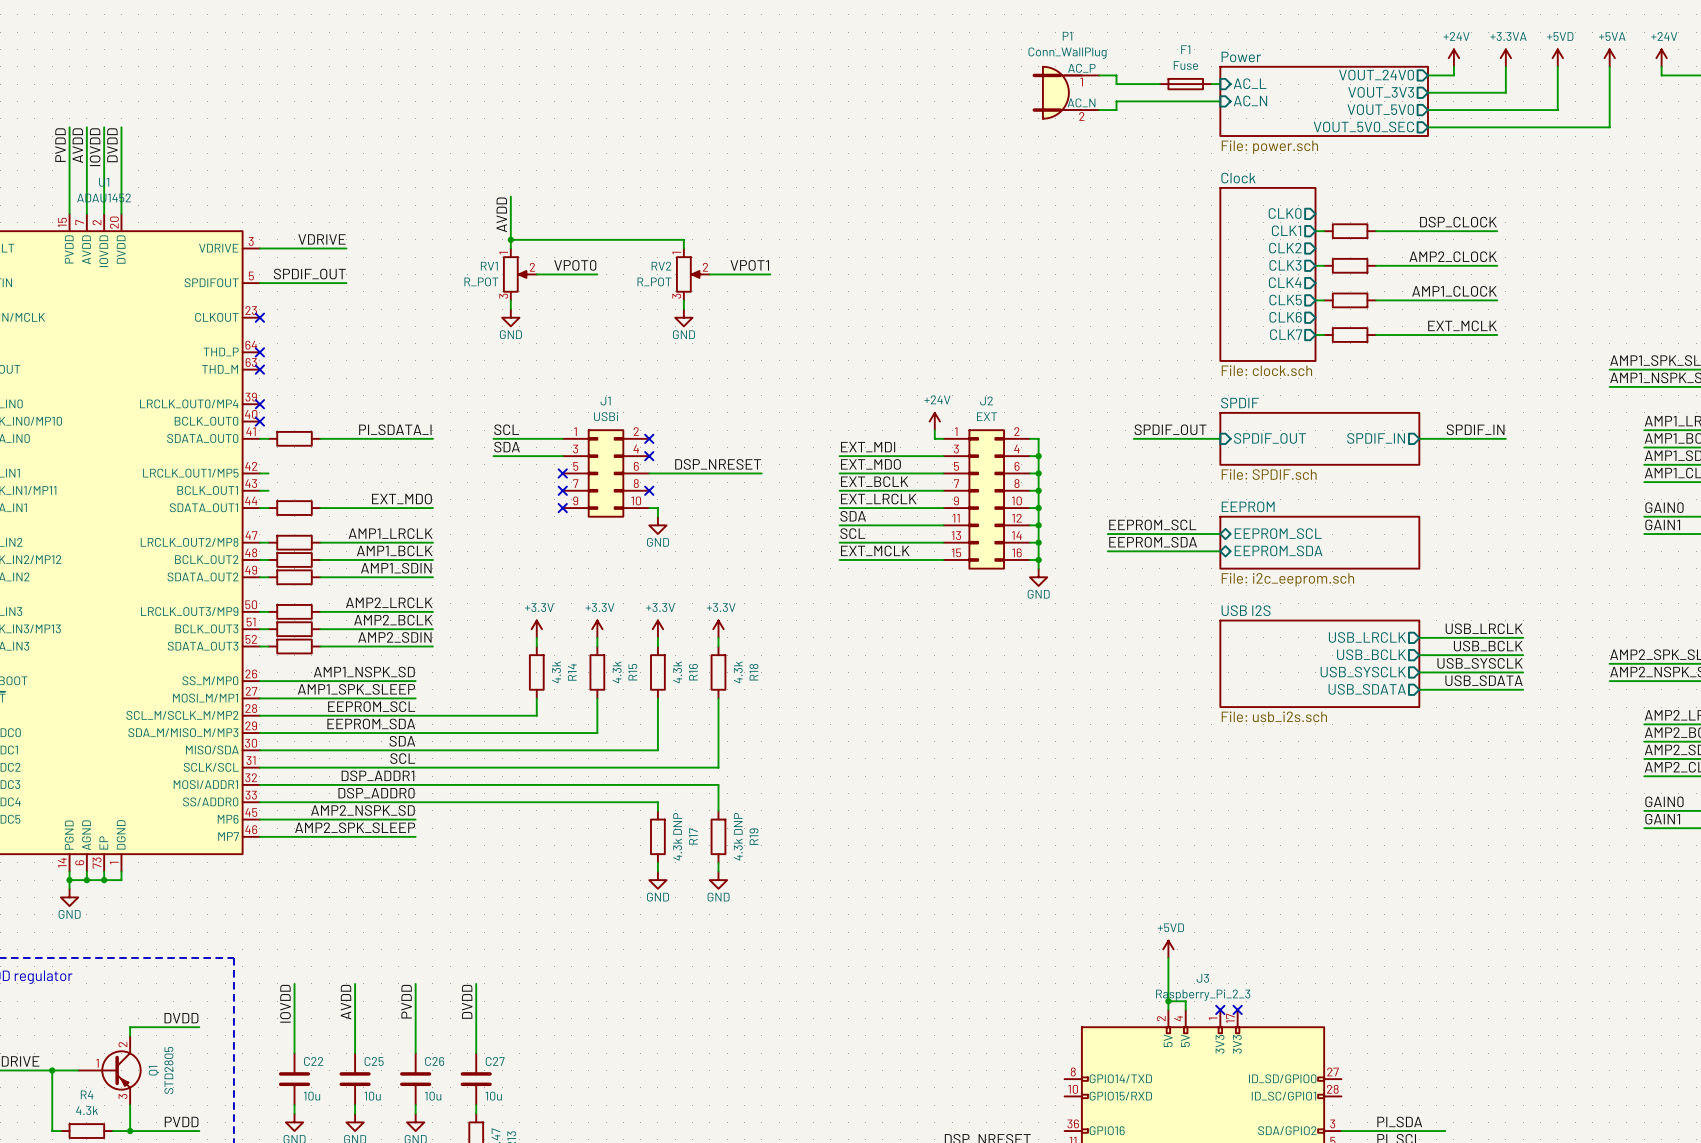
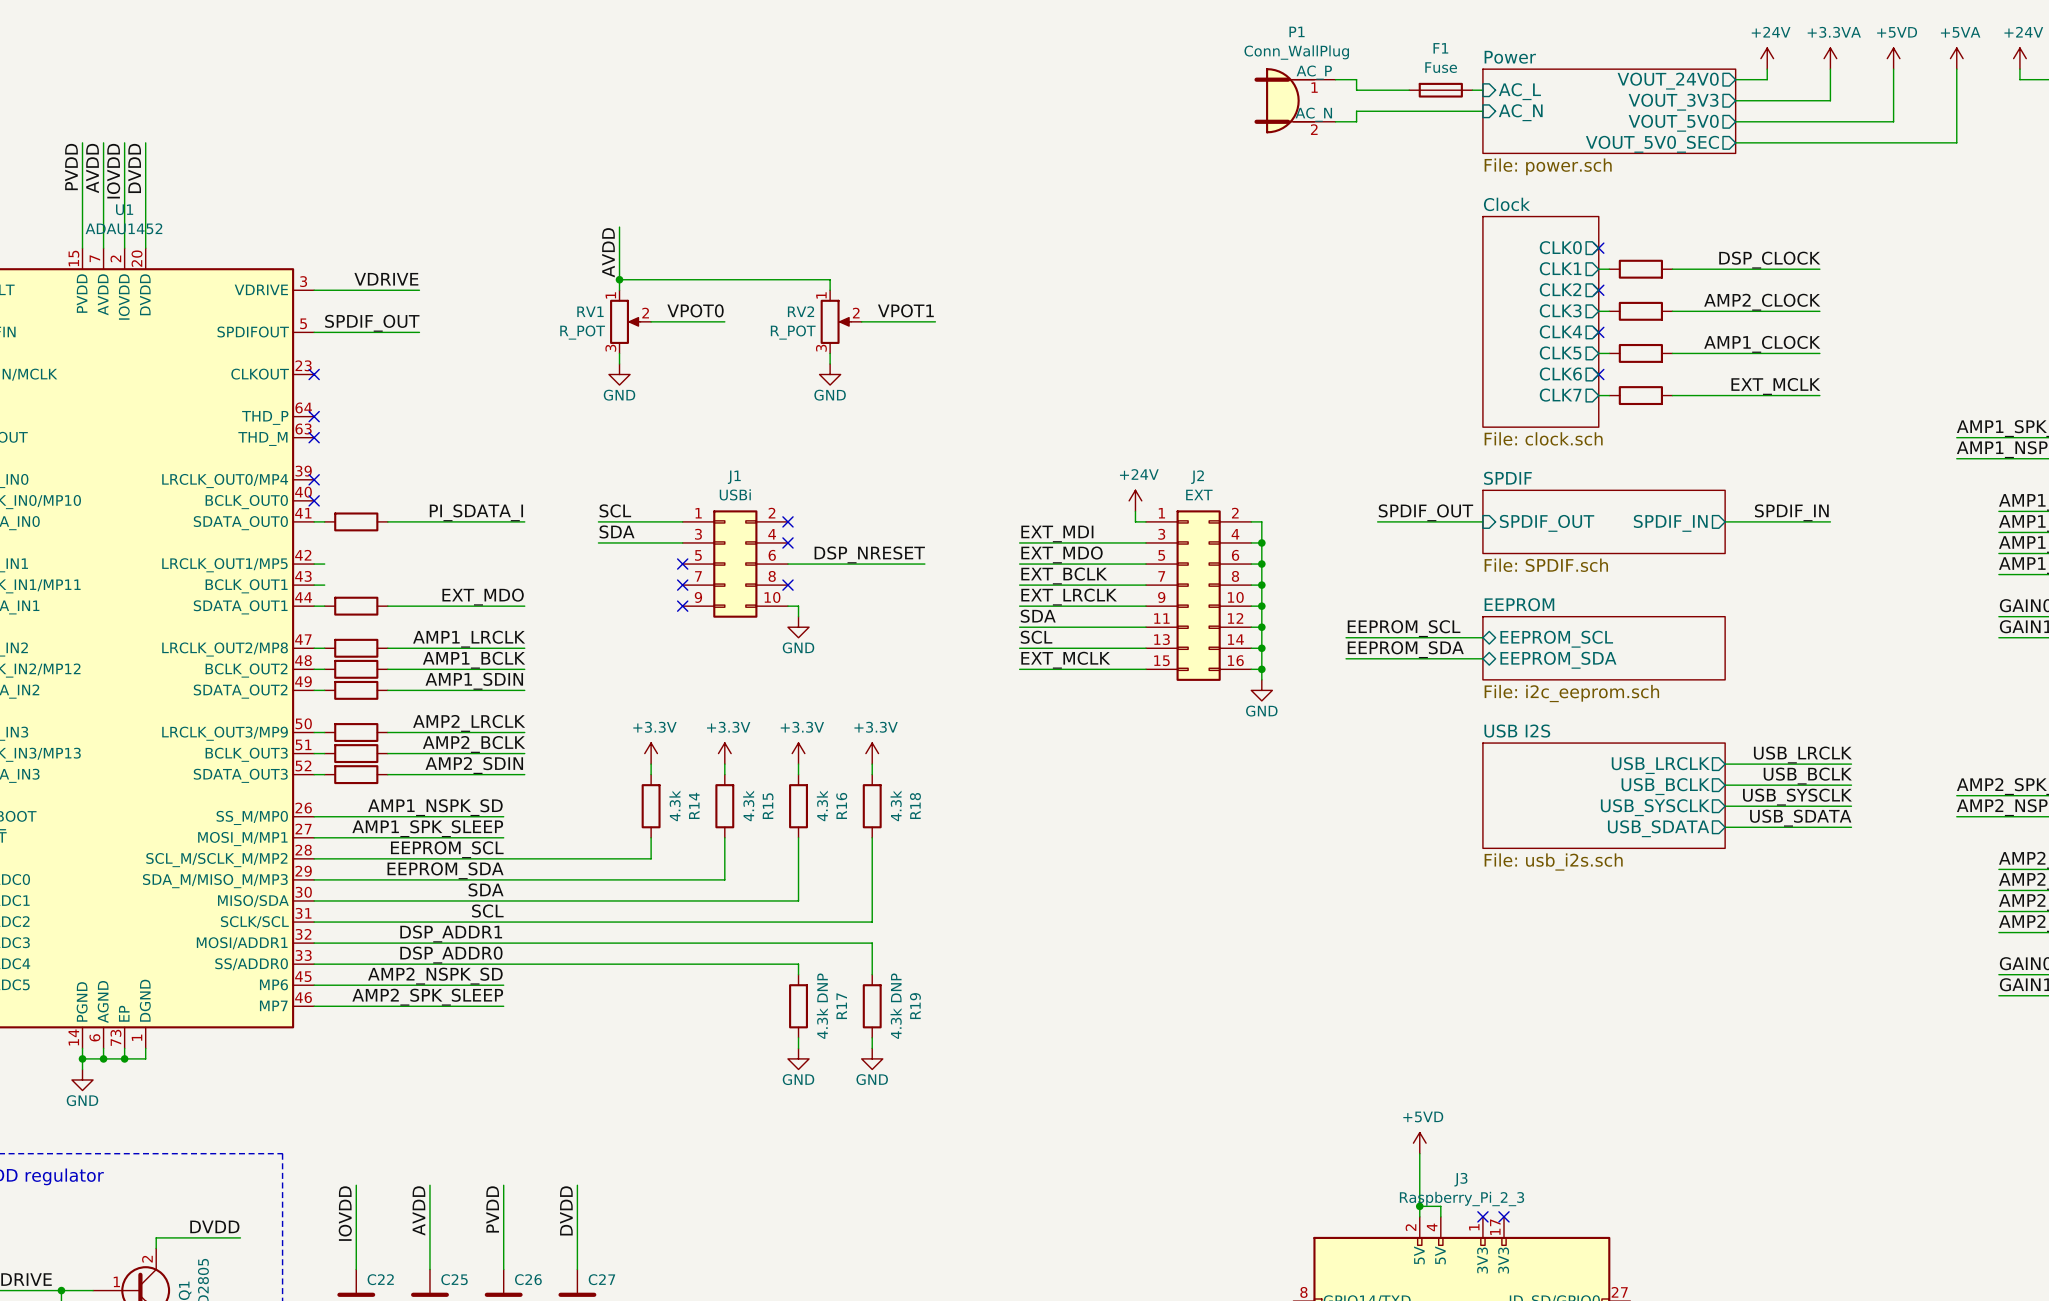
no-connect mark: none -> (1598, 248)
no-connect mark: none -> (1598, 290)
no-connect mark: none -> (1598, 332)
no-connect mark: none -> (1598, 374)

